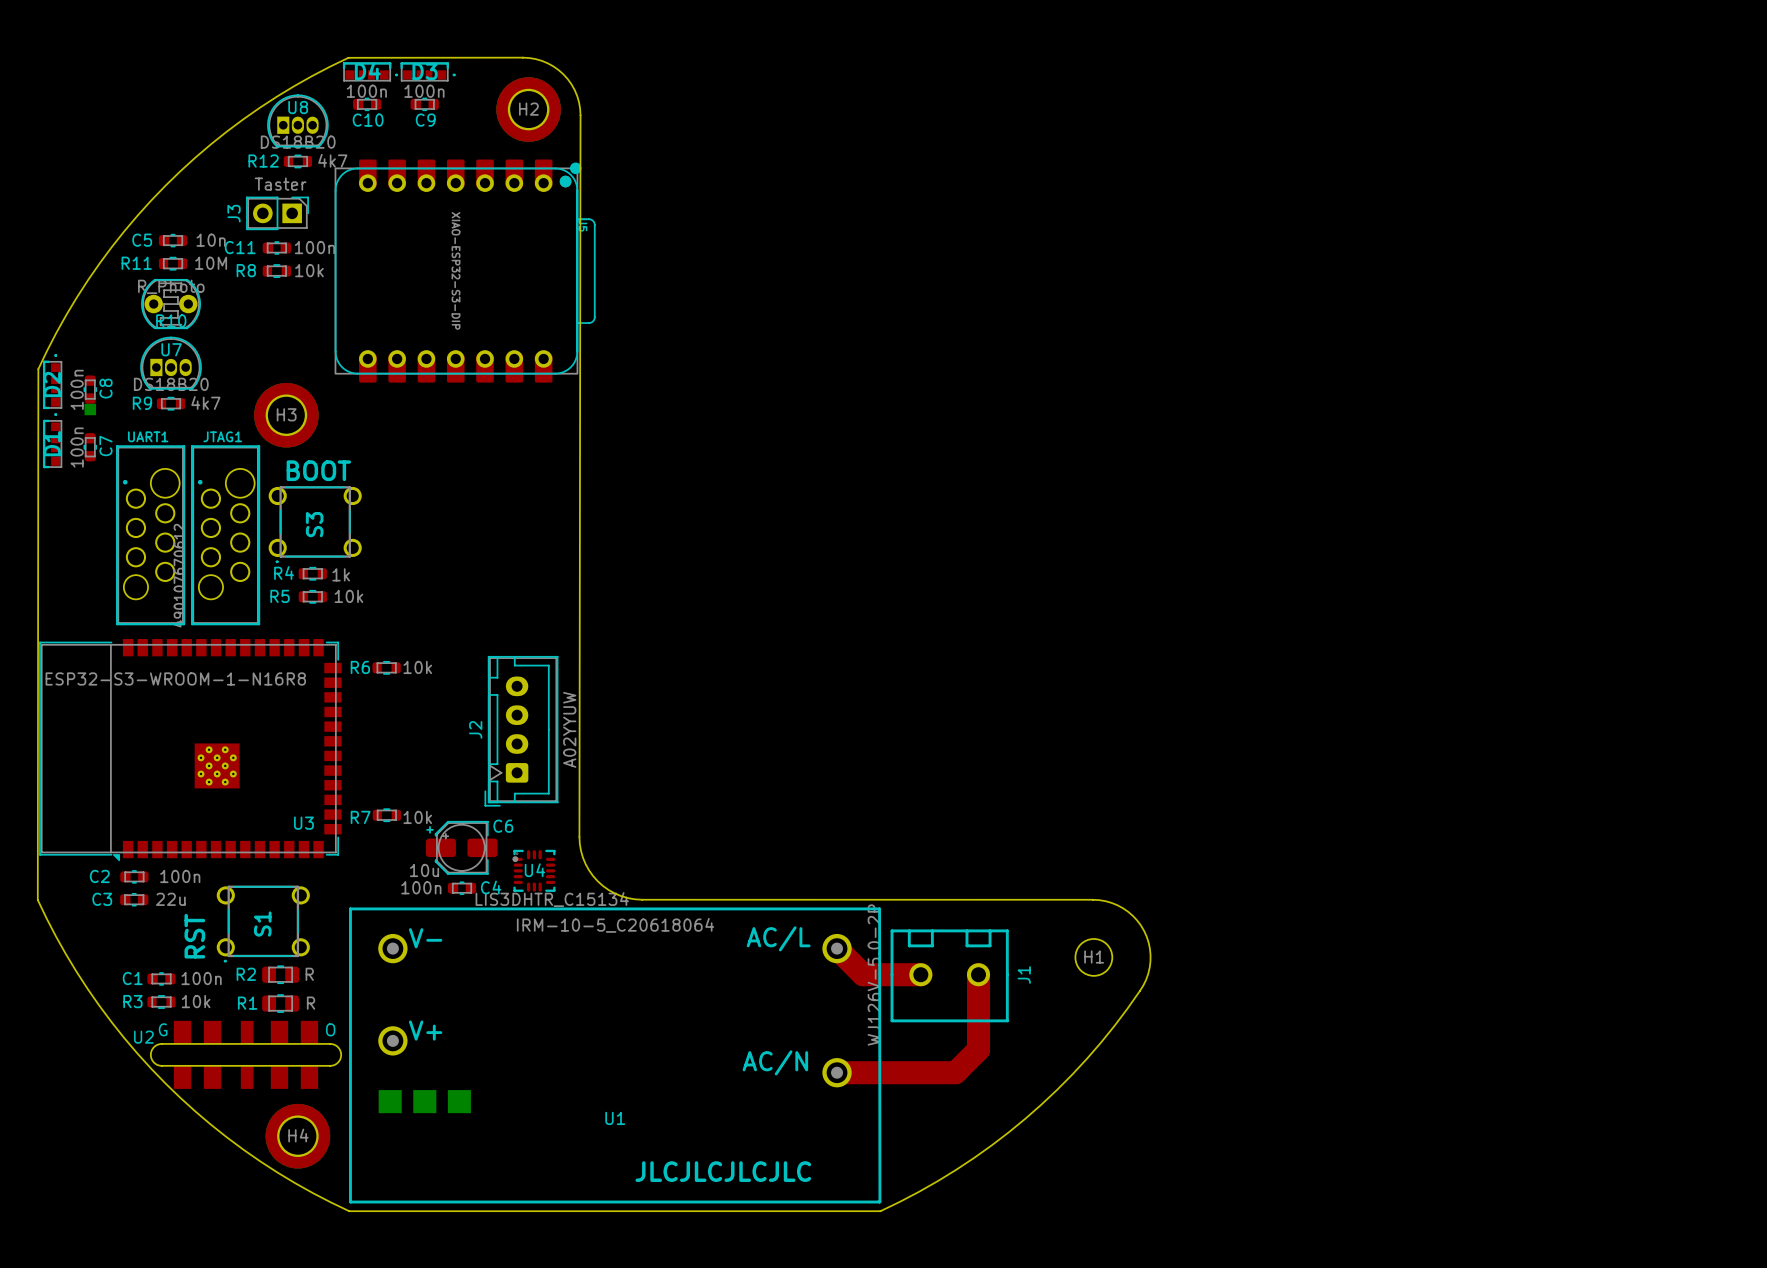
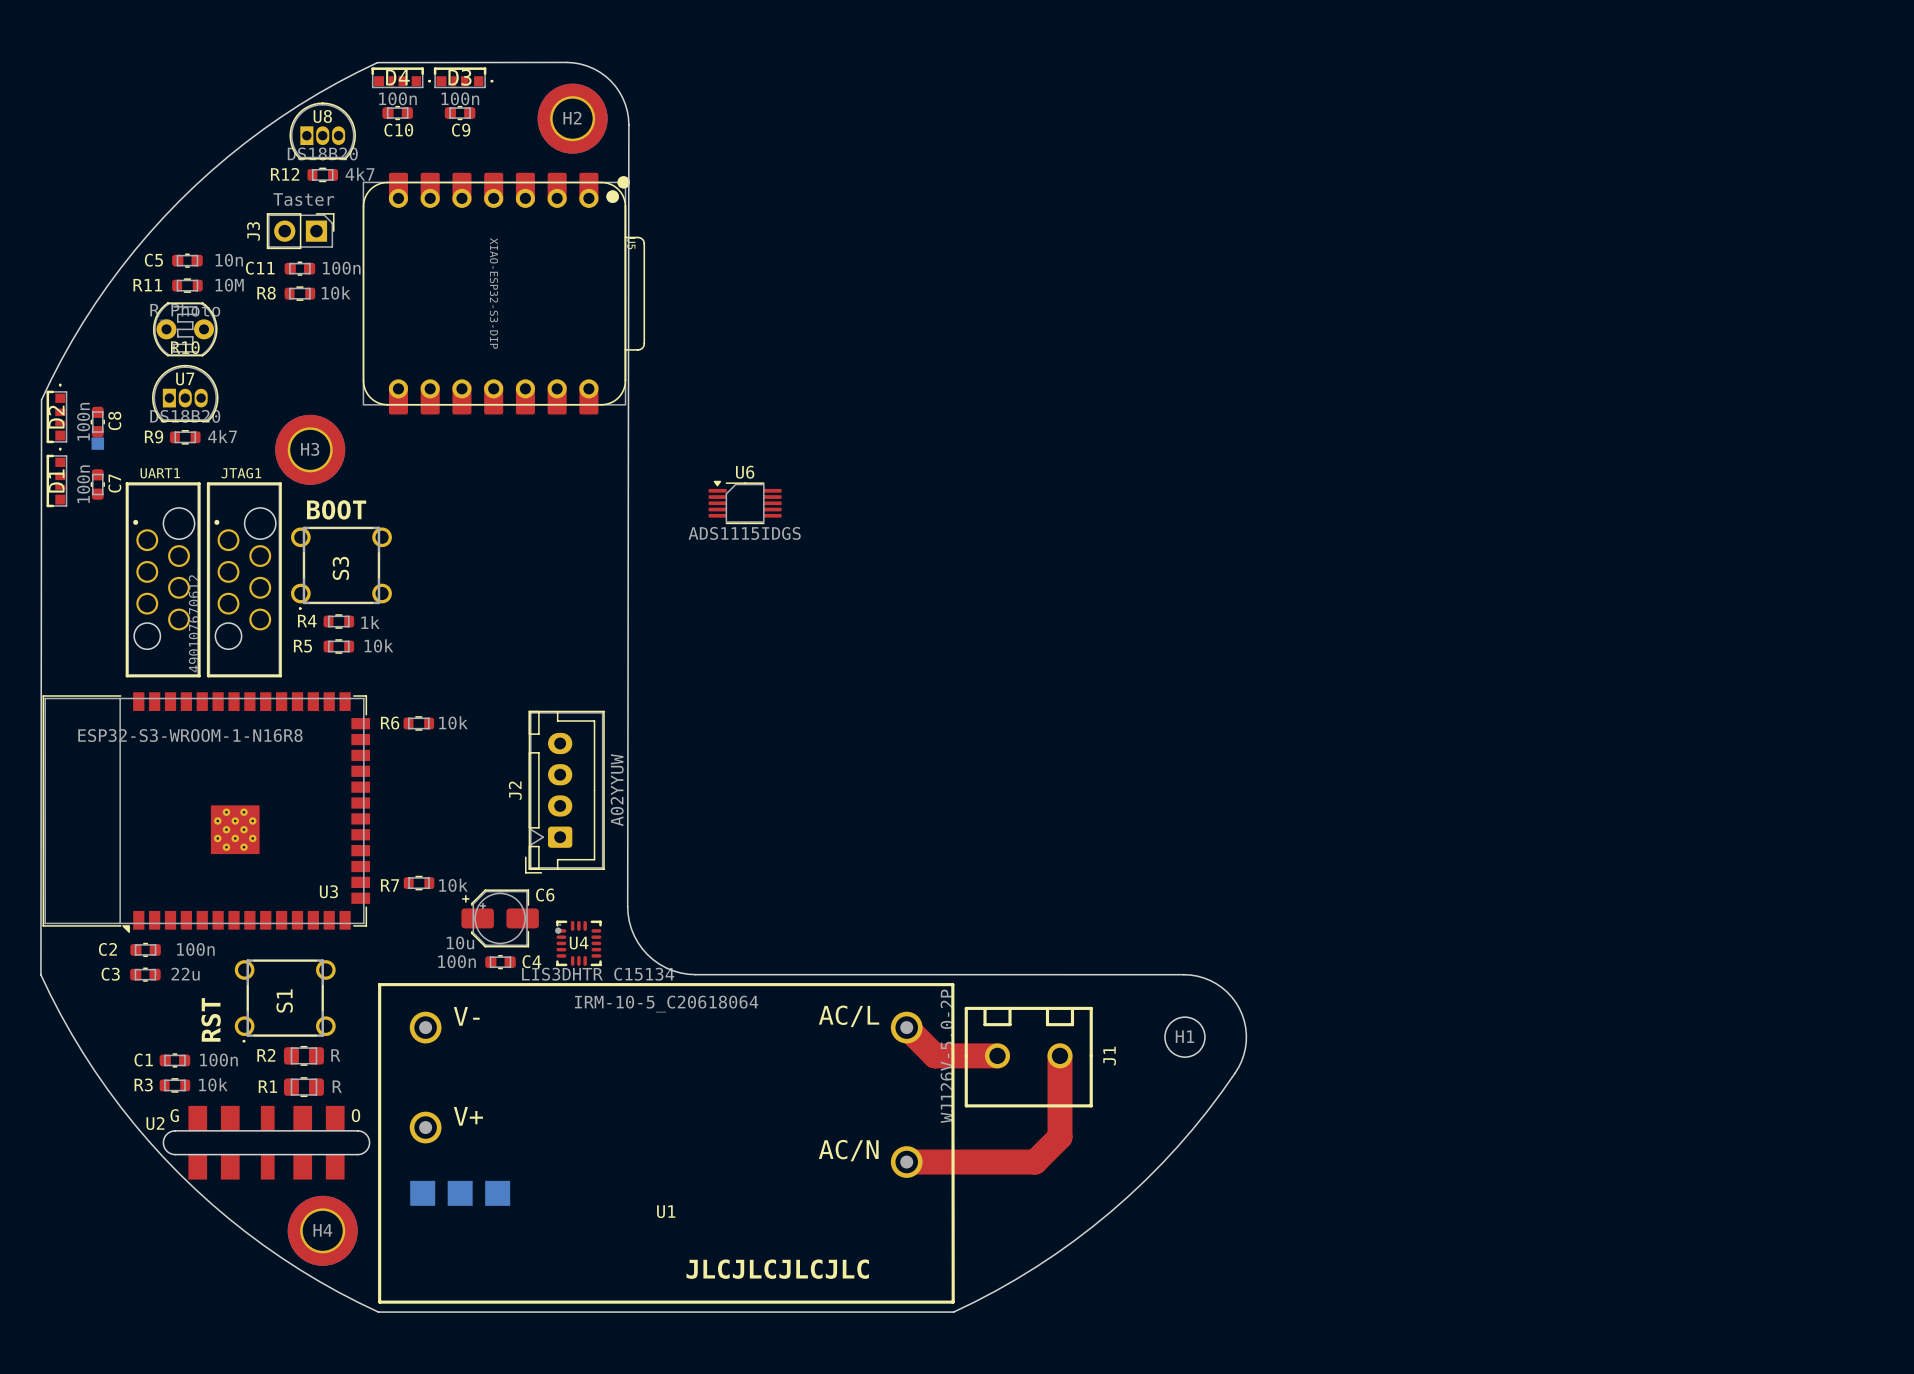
U6: none -> ADS1115IDGS (745, 502)

